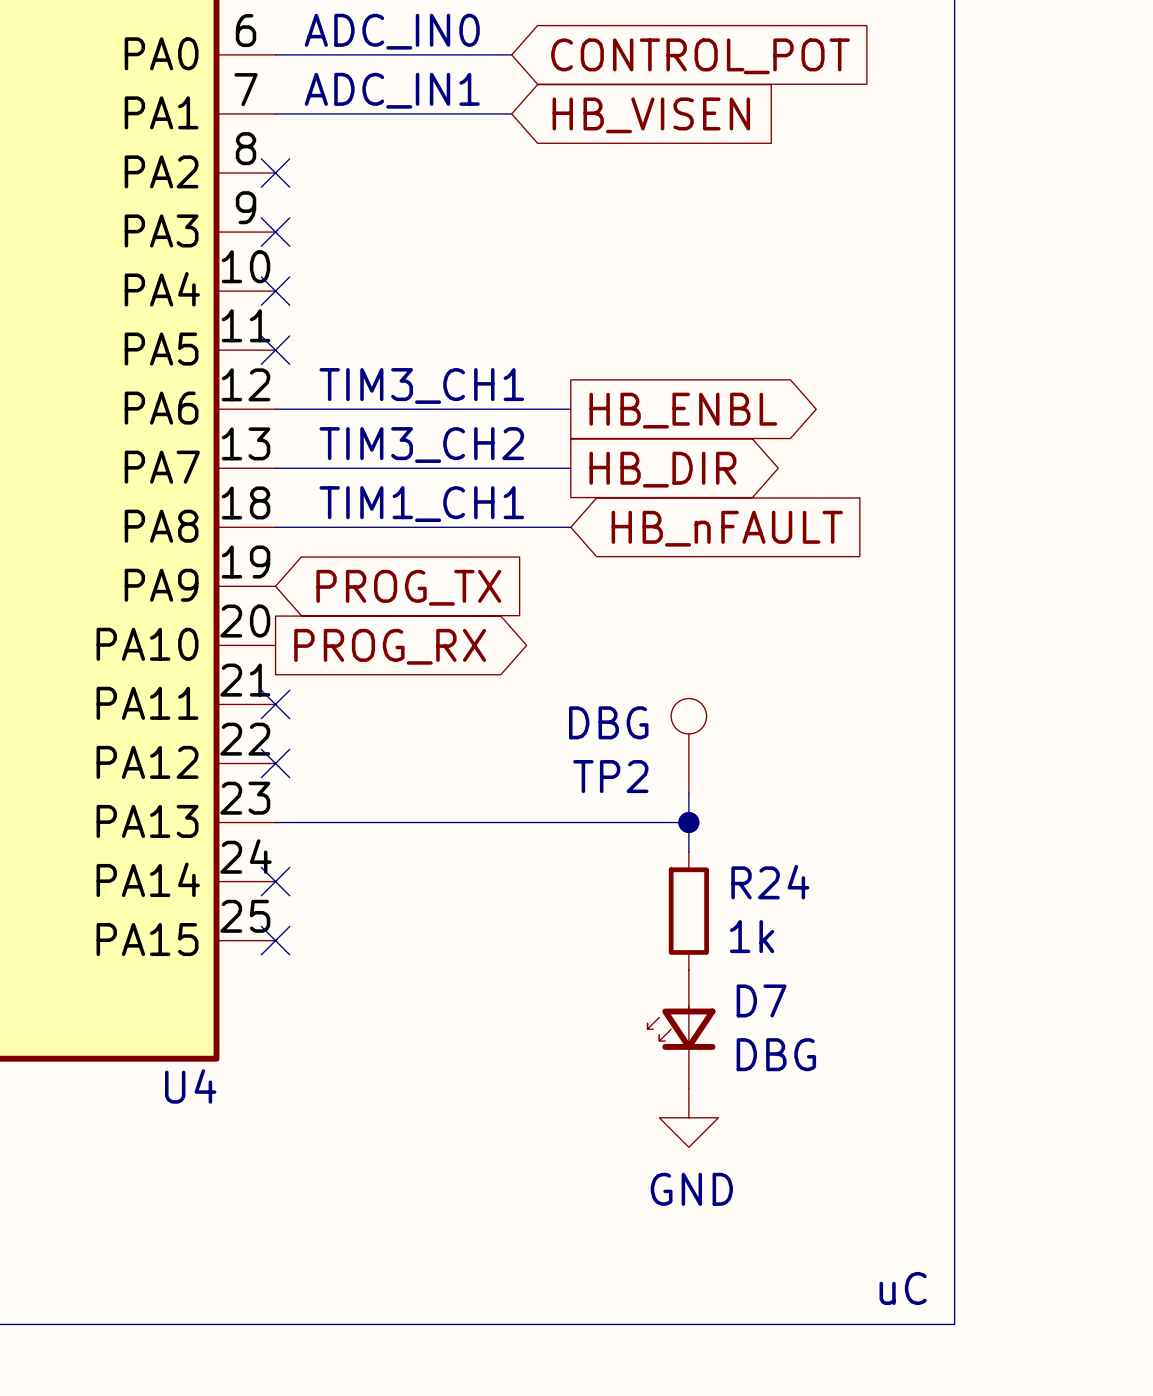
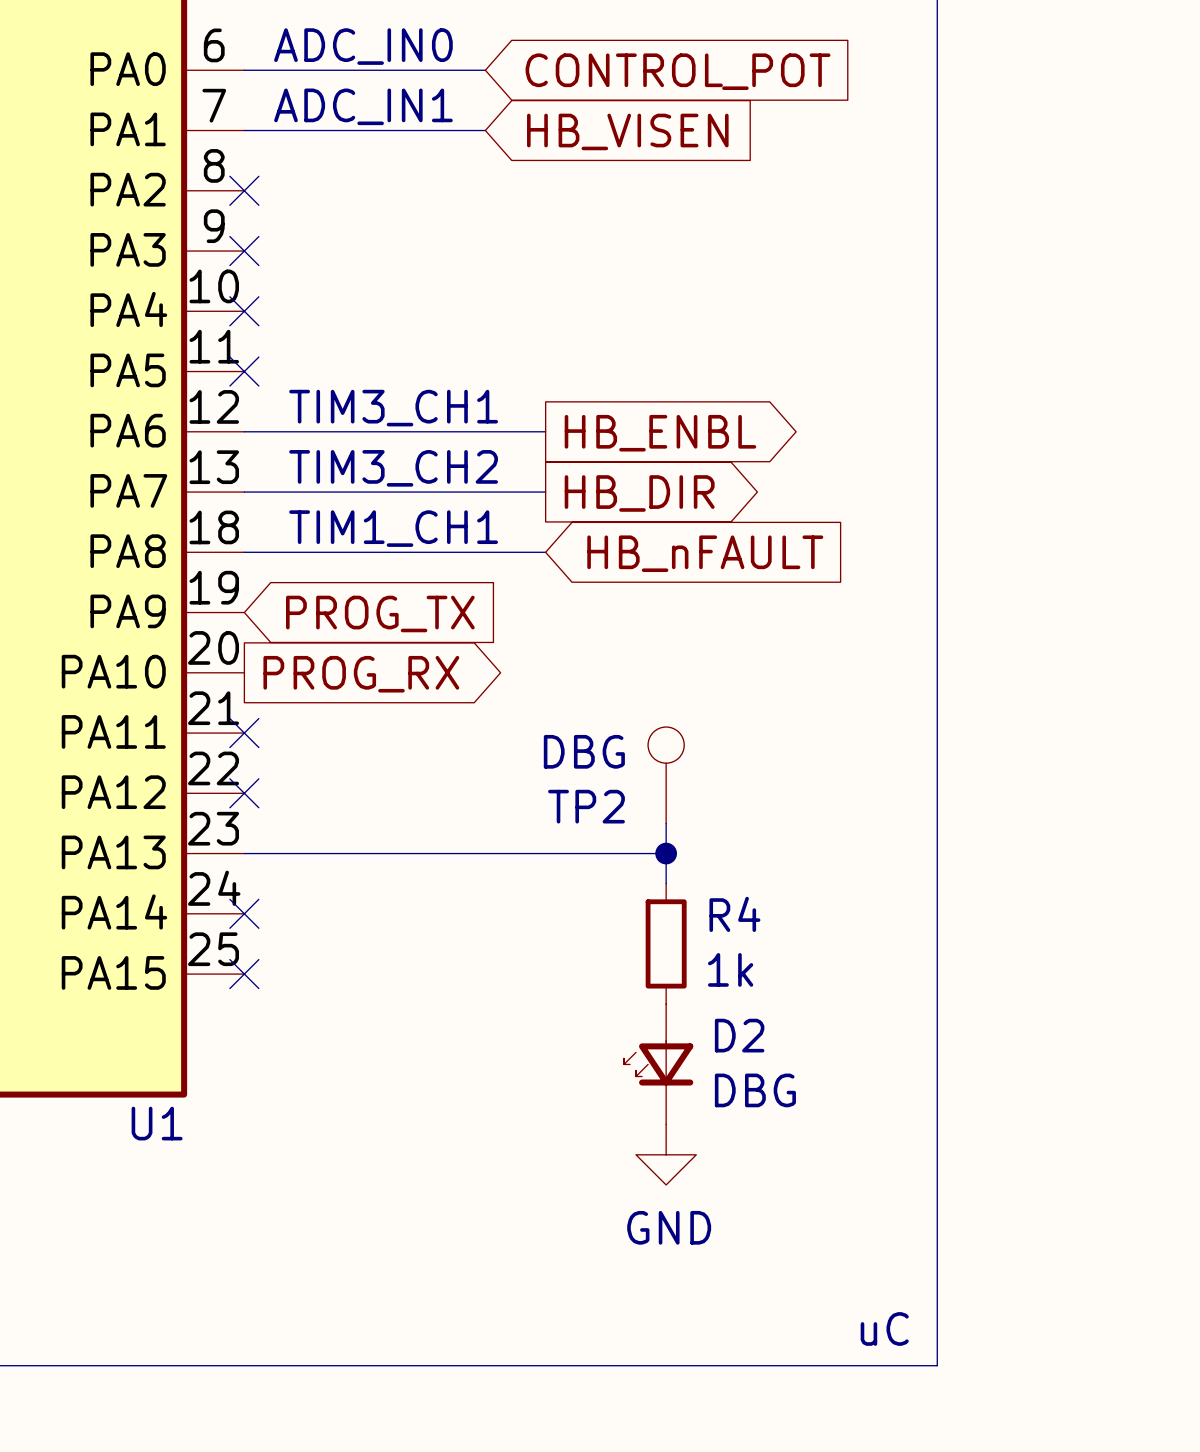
R24 name: R24 (770, 882) -> R4 (734, 914)
D7 name: D7 (761, 1000) -> D2 (739, 1035)
U4 name: U4 (190, 1086) -> U1 (157, 1123)

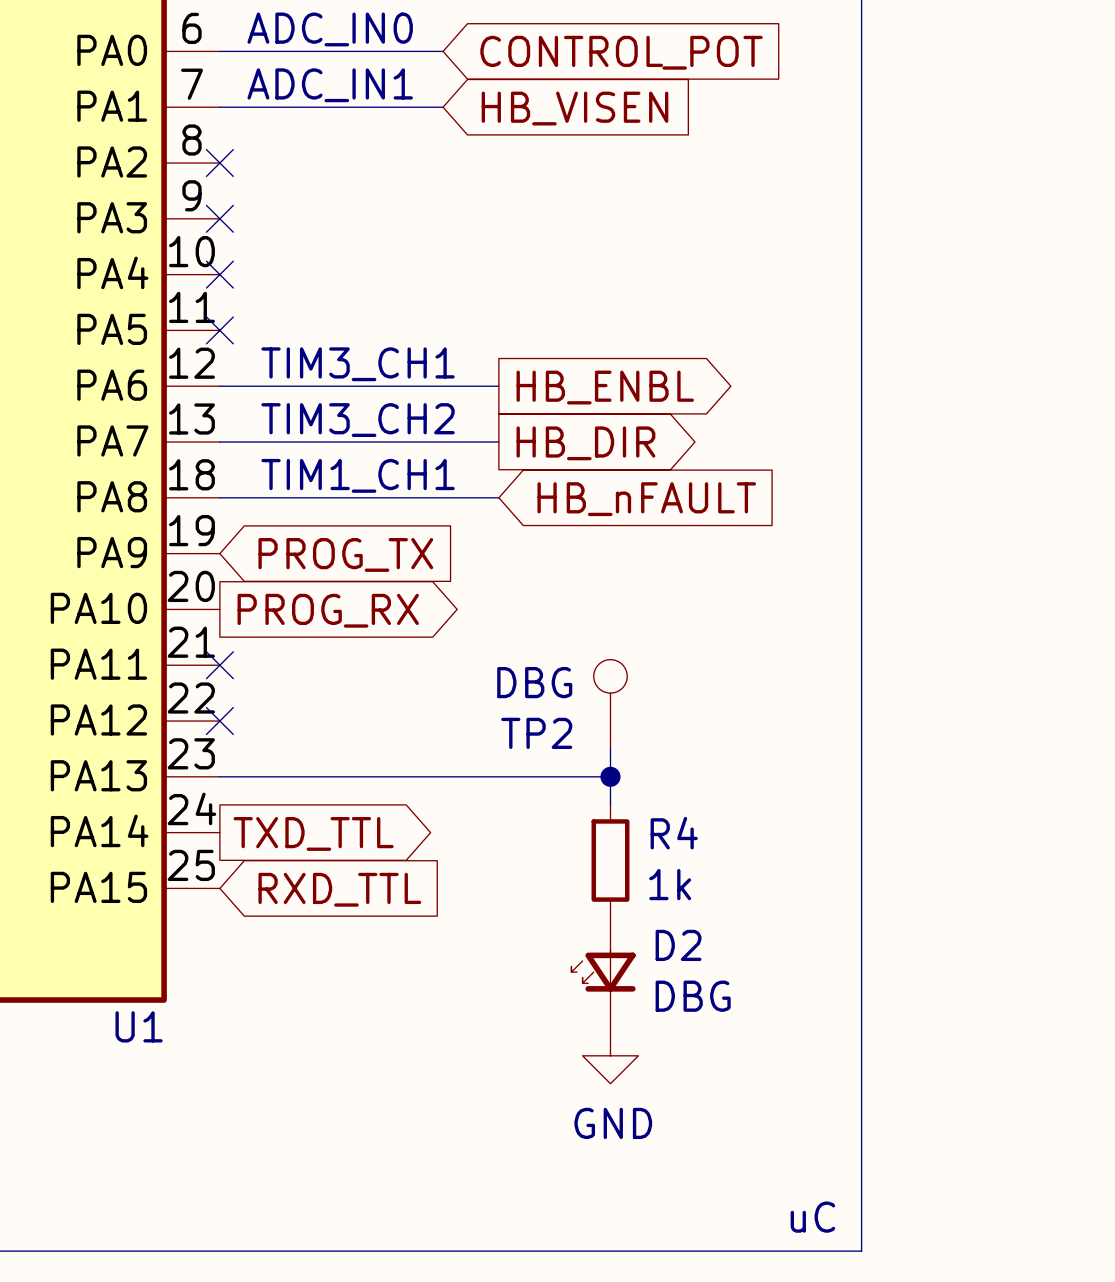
no-connect mark: (244, 913) -> none
global label: none -> TXD_TTL (313, 833)
no-connect mark: (244, 974) -> none
global label: none -> RXD_TTL (339, 889)

